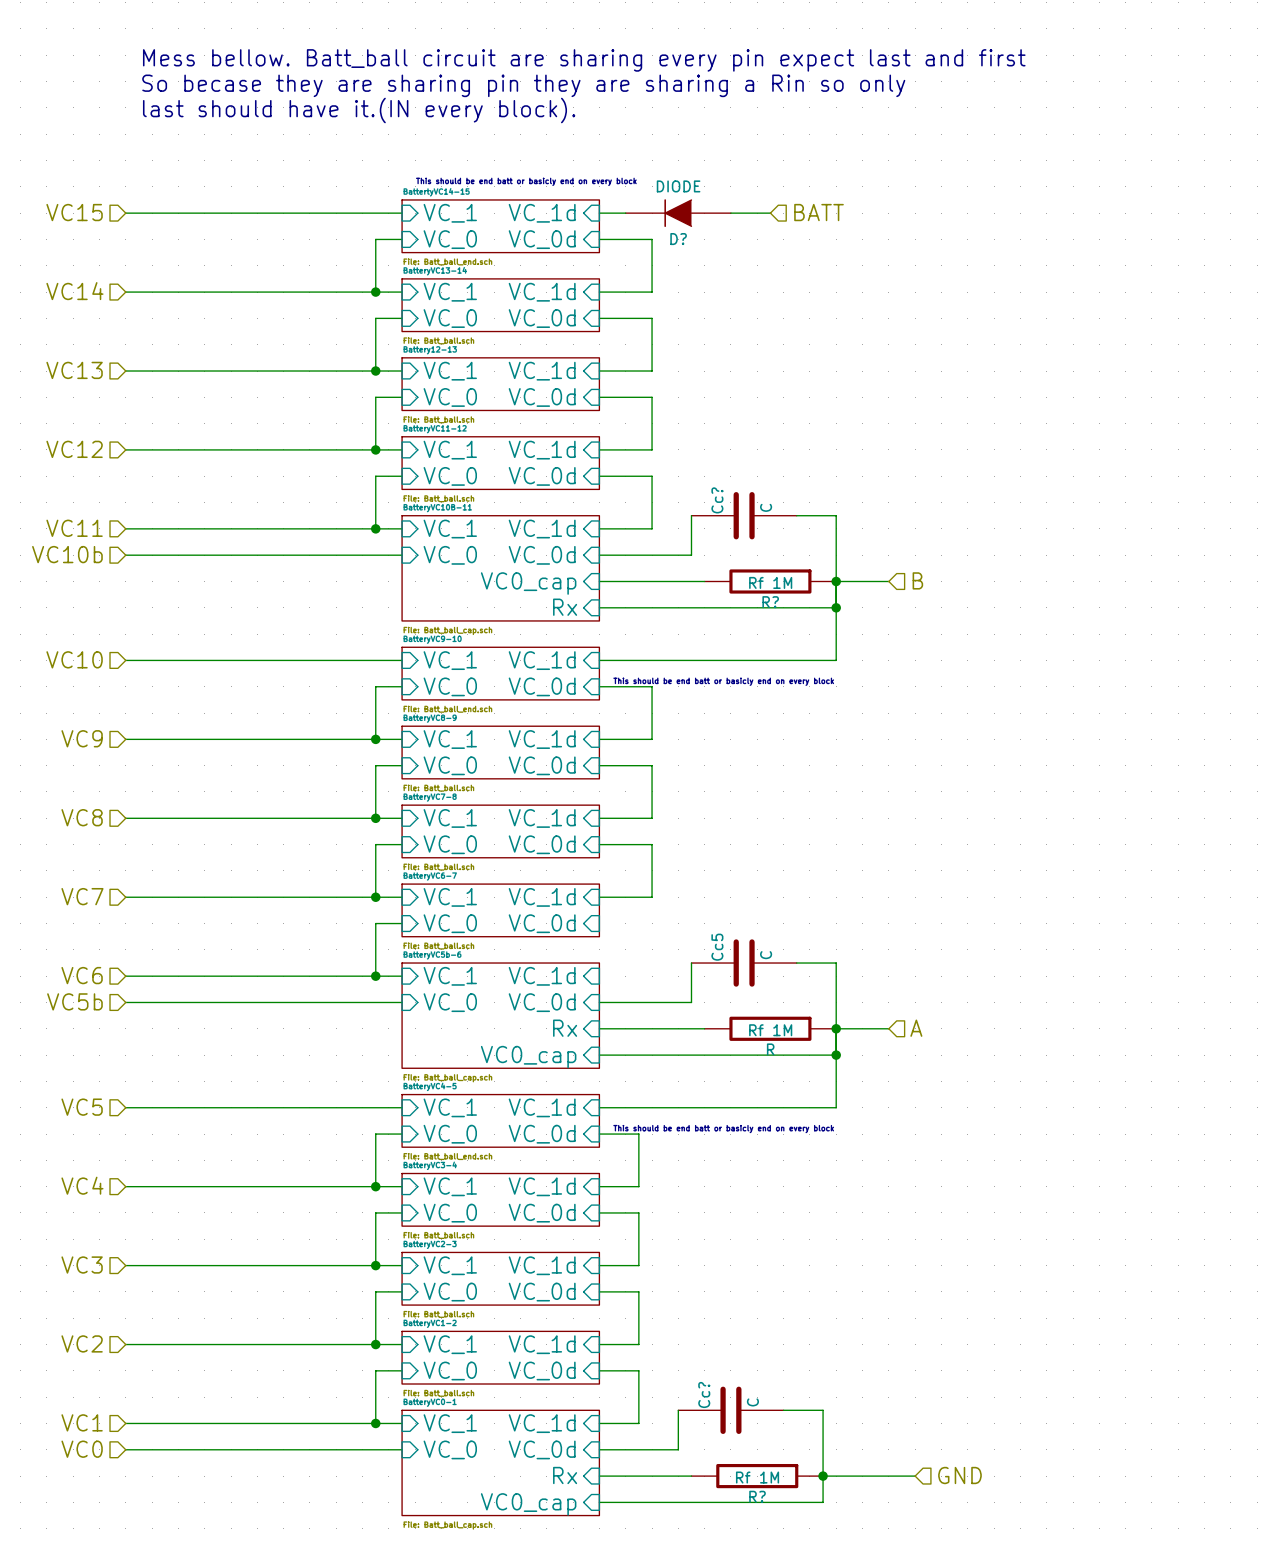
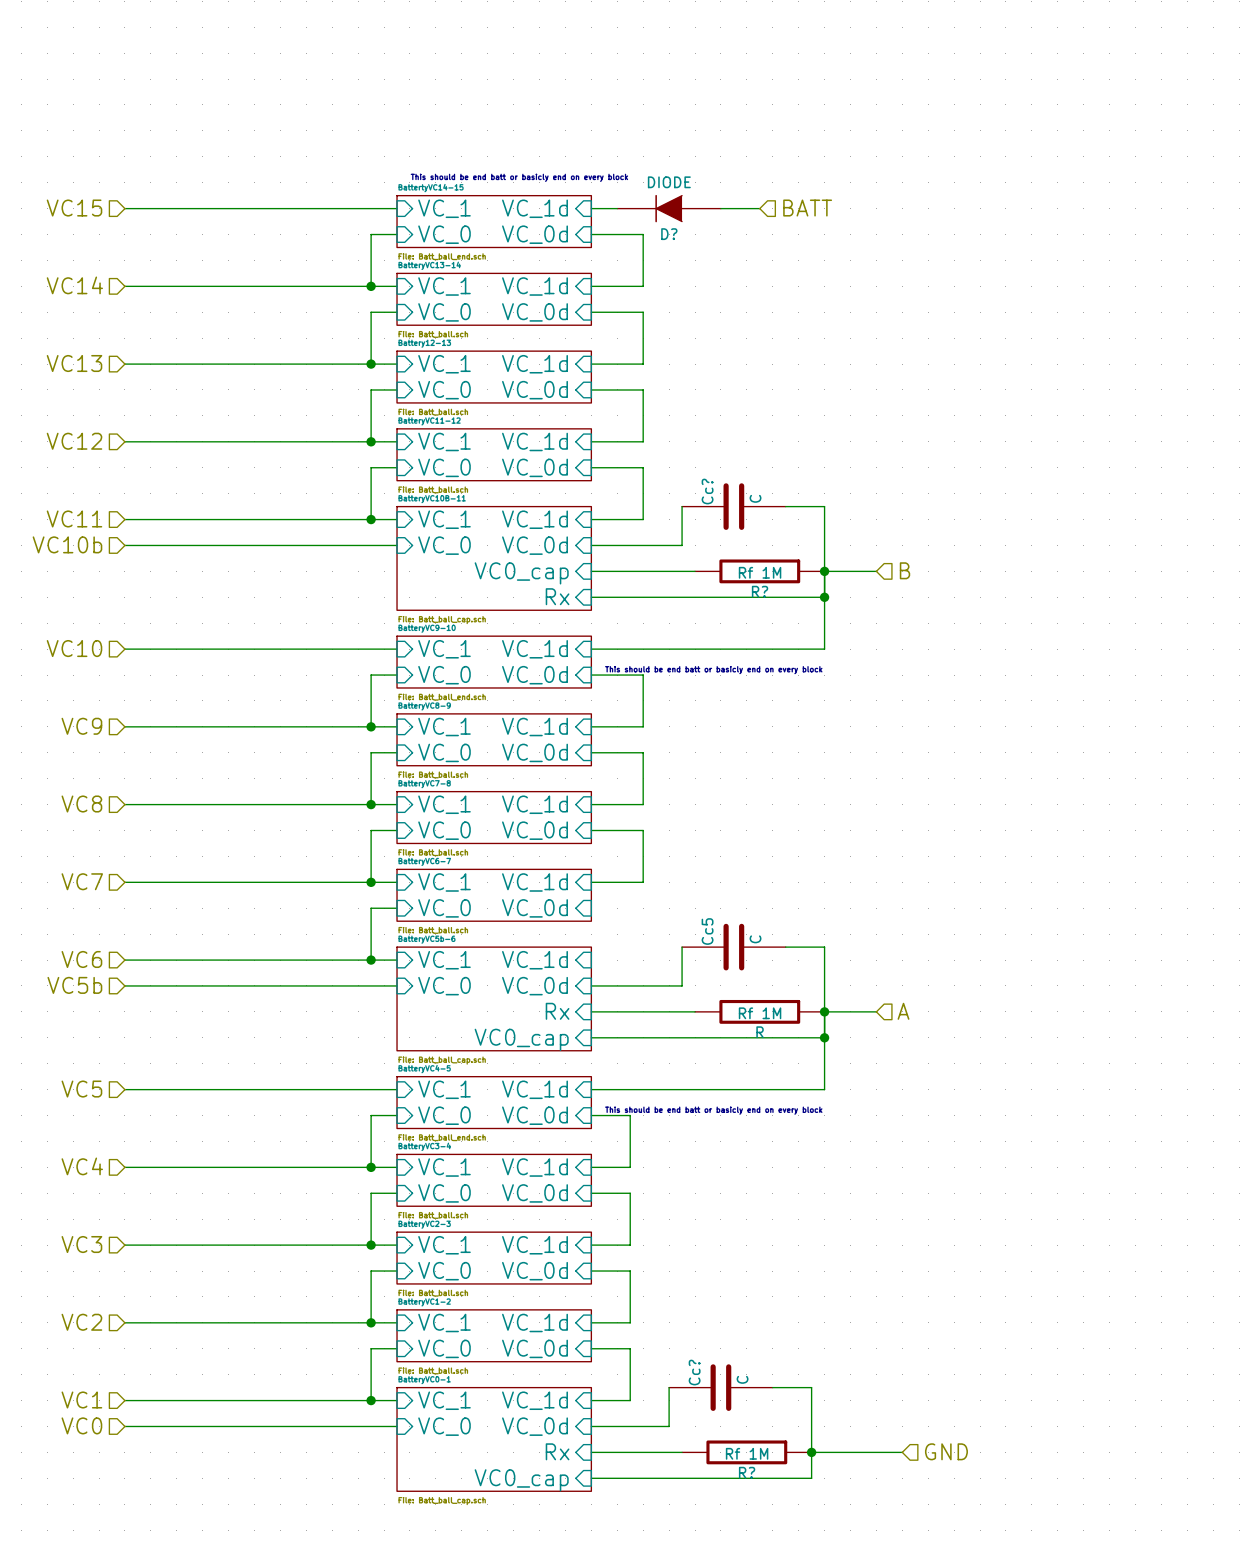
text: Mess bellow. Batt_ball circuit are sharing every pin expect last and first (584, 60) -> none
text: So becase they are sharing pin they are sharing a Rin so only (523, 85) -> none
text: last should have it.(IN every block). (359, 110) -> none

